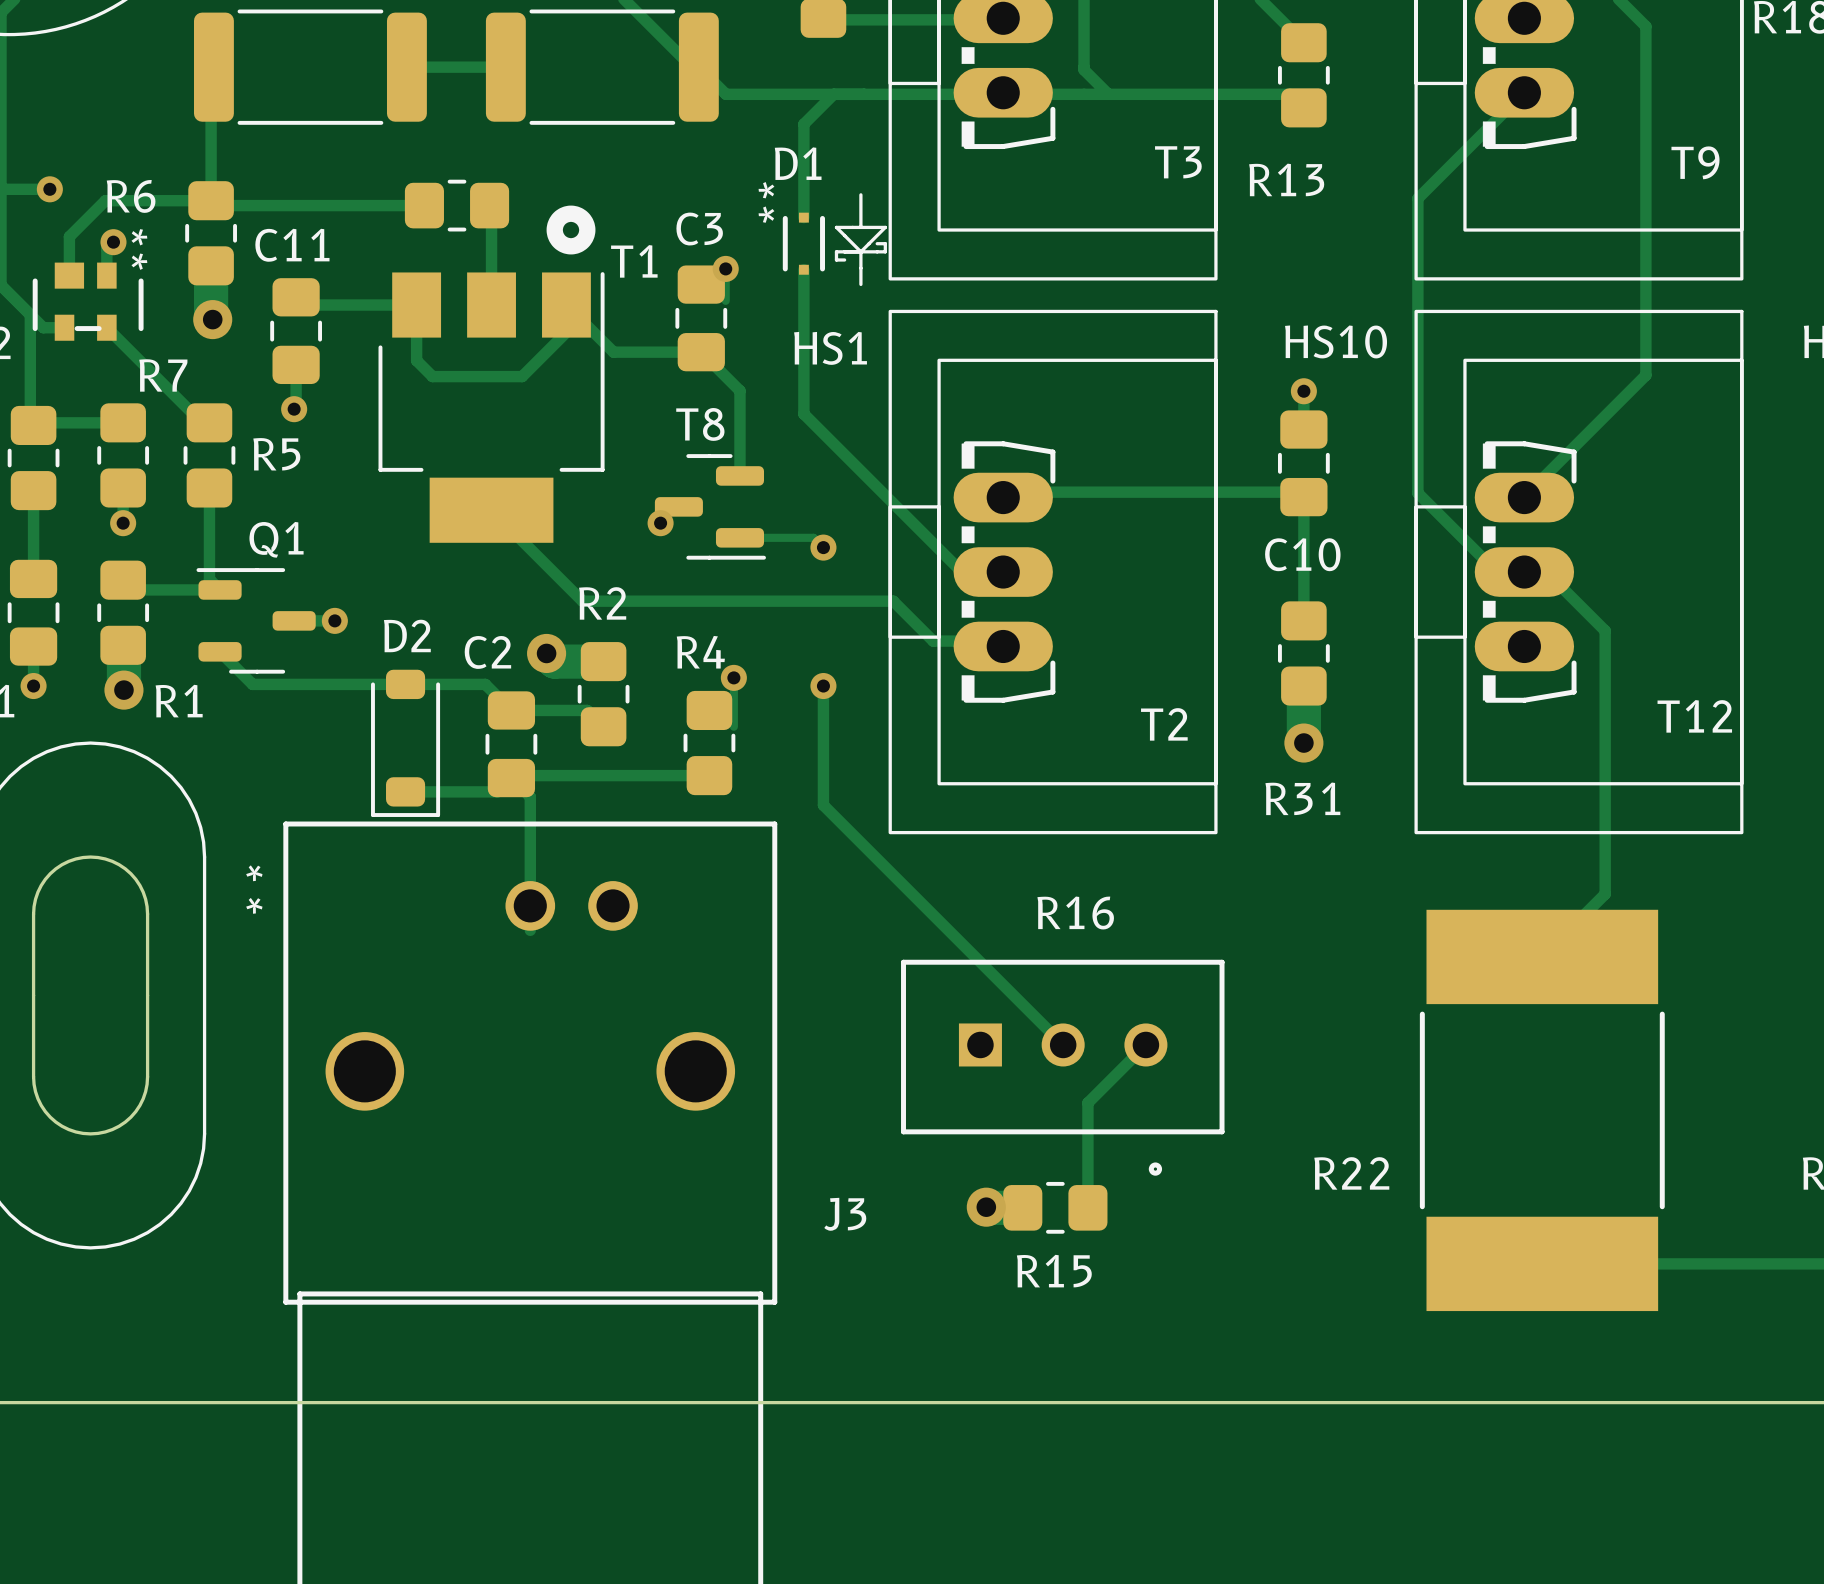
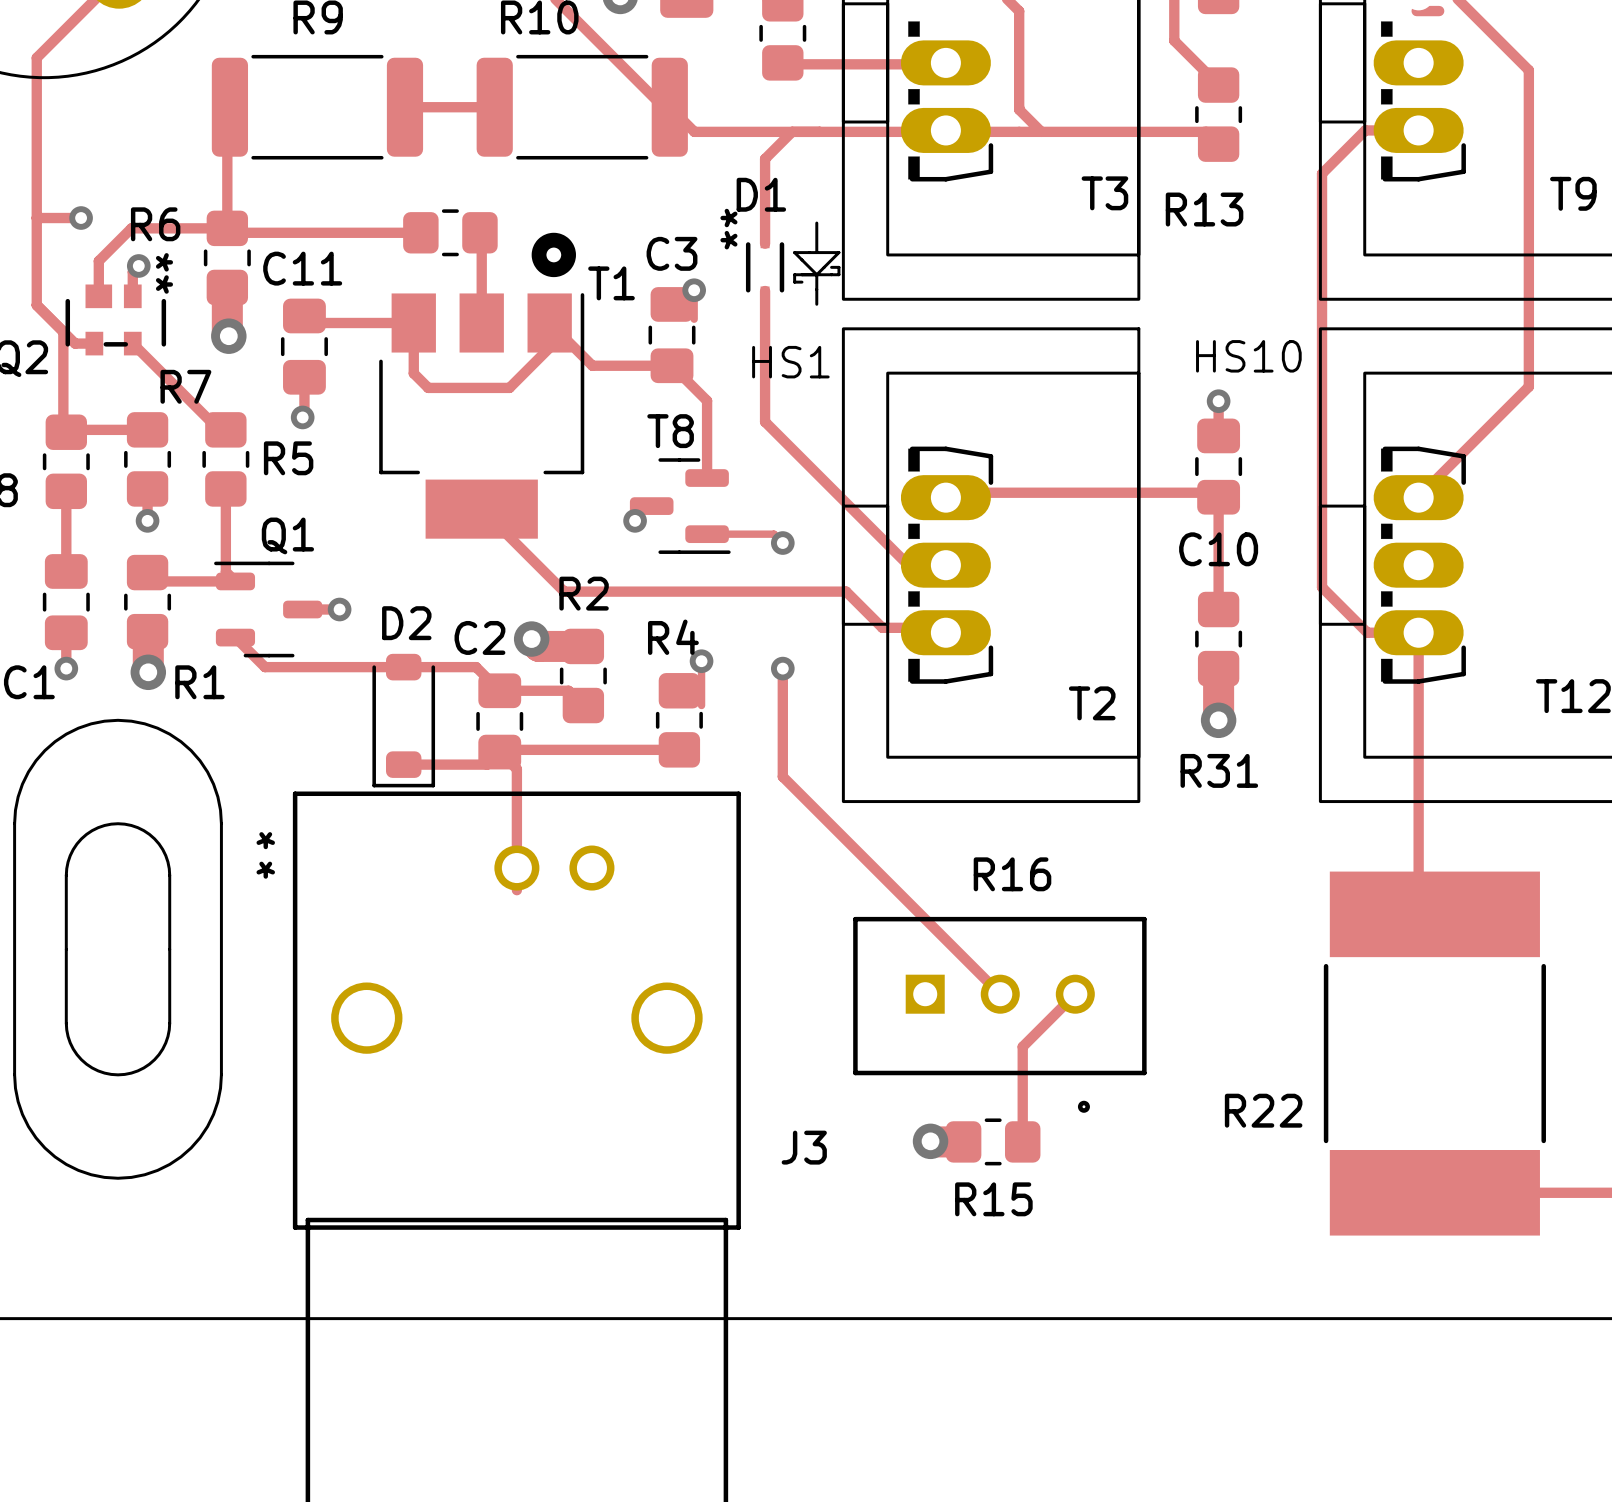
track: (1522, 93) (1417, 198) -> (1418, 130) (1365, 130) (1322, 173) (1322, 226)
track: (1417, 493) (1497, 573) -> none
track: (1547, 573) (1605, 630) (1605, 894) (1542, 956) -> (1322, 493) (1322, 587) (1367, 632) (1418, 632) (1418, 898) (1434, 914)

